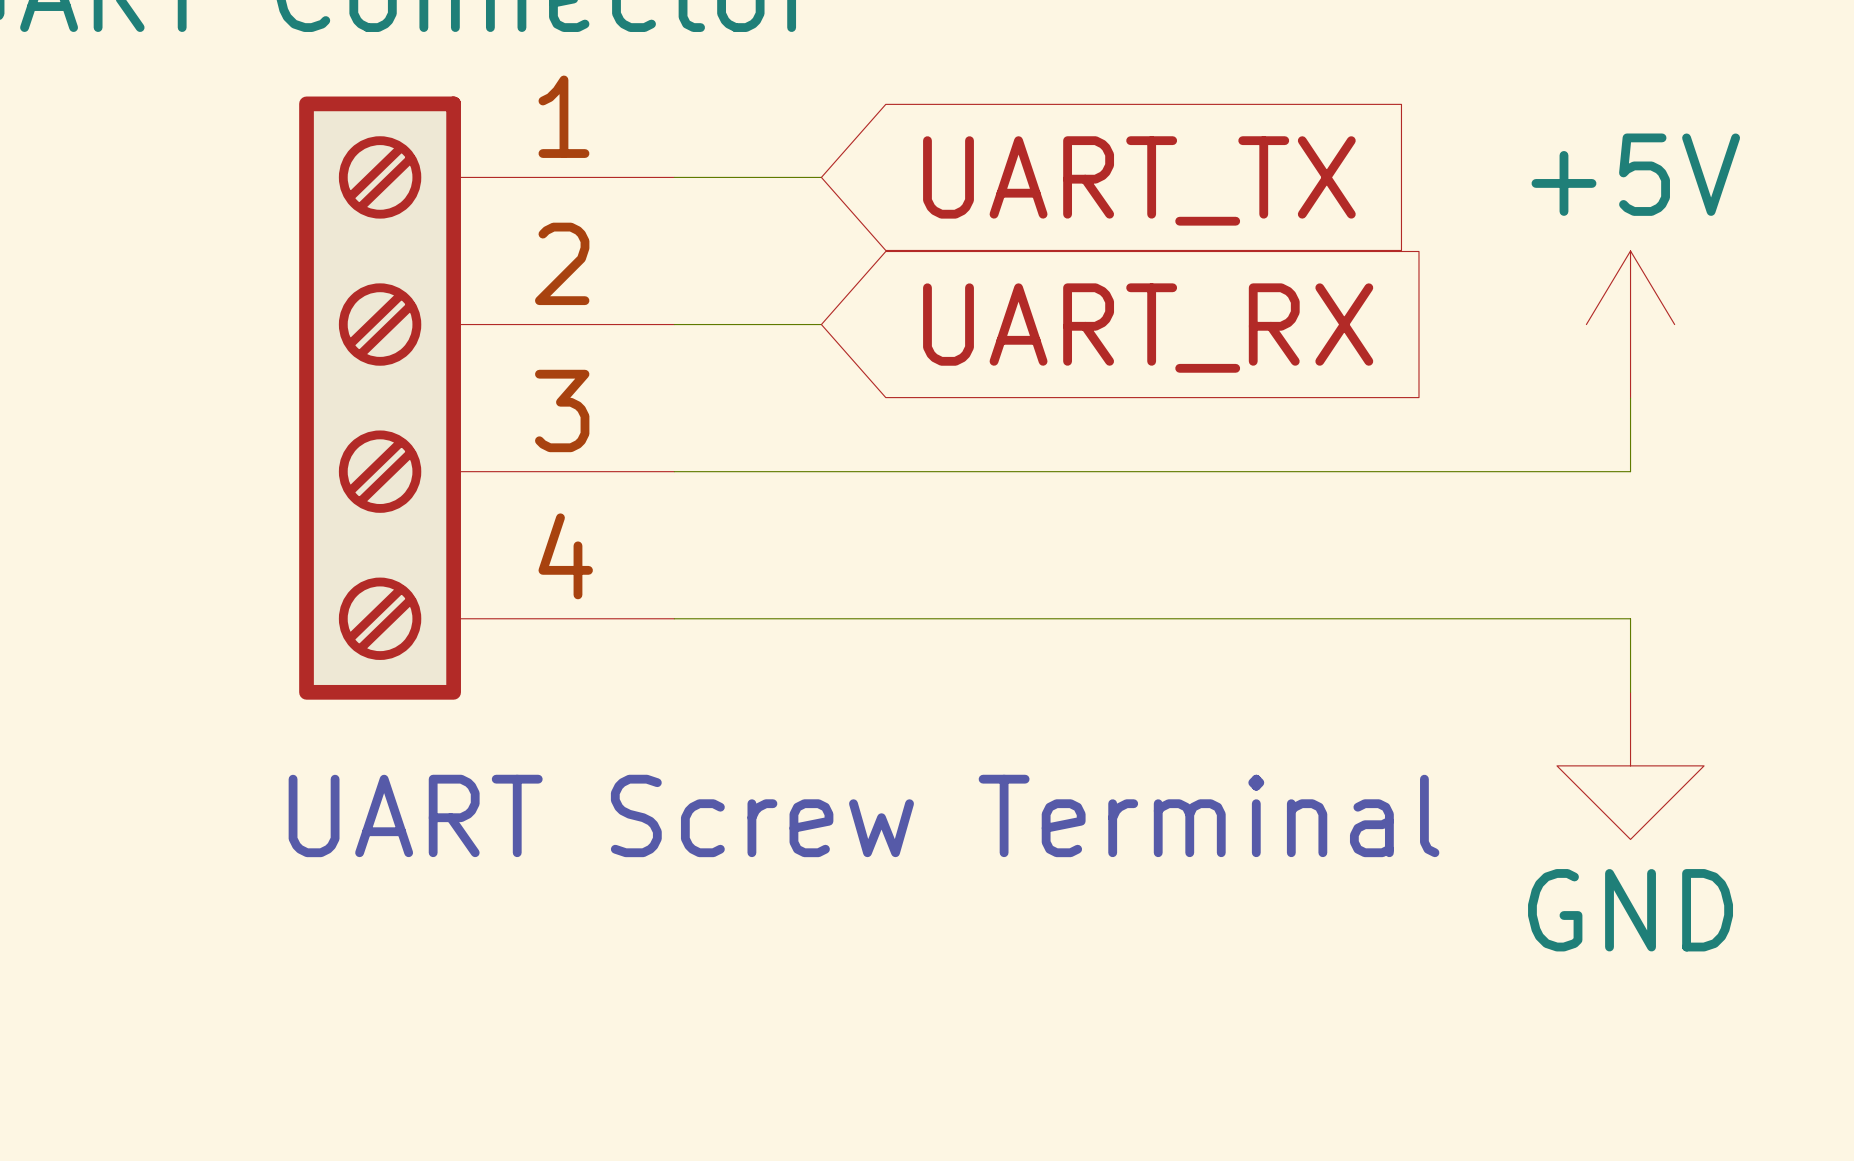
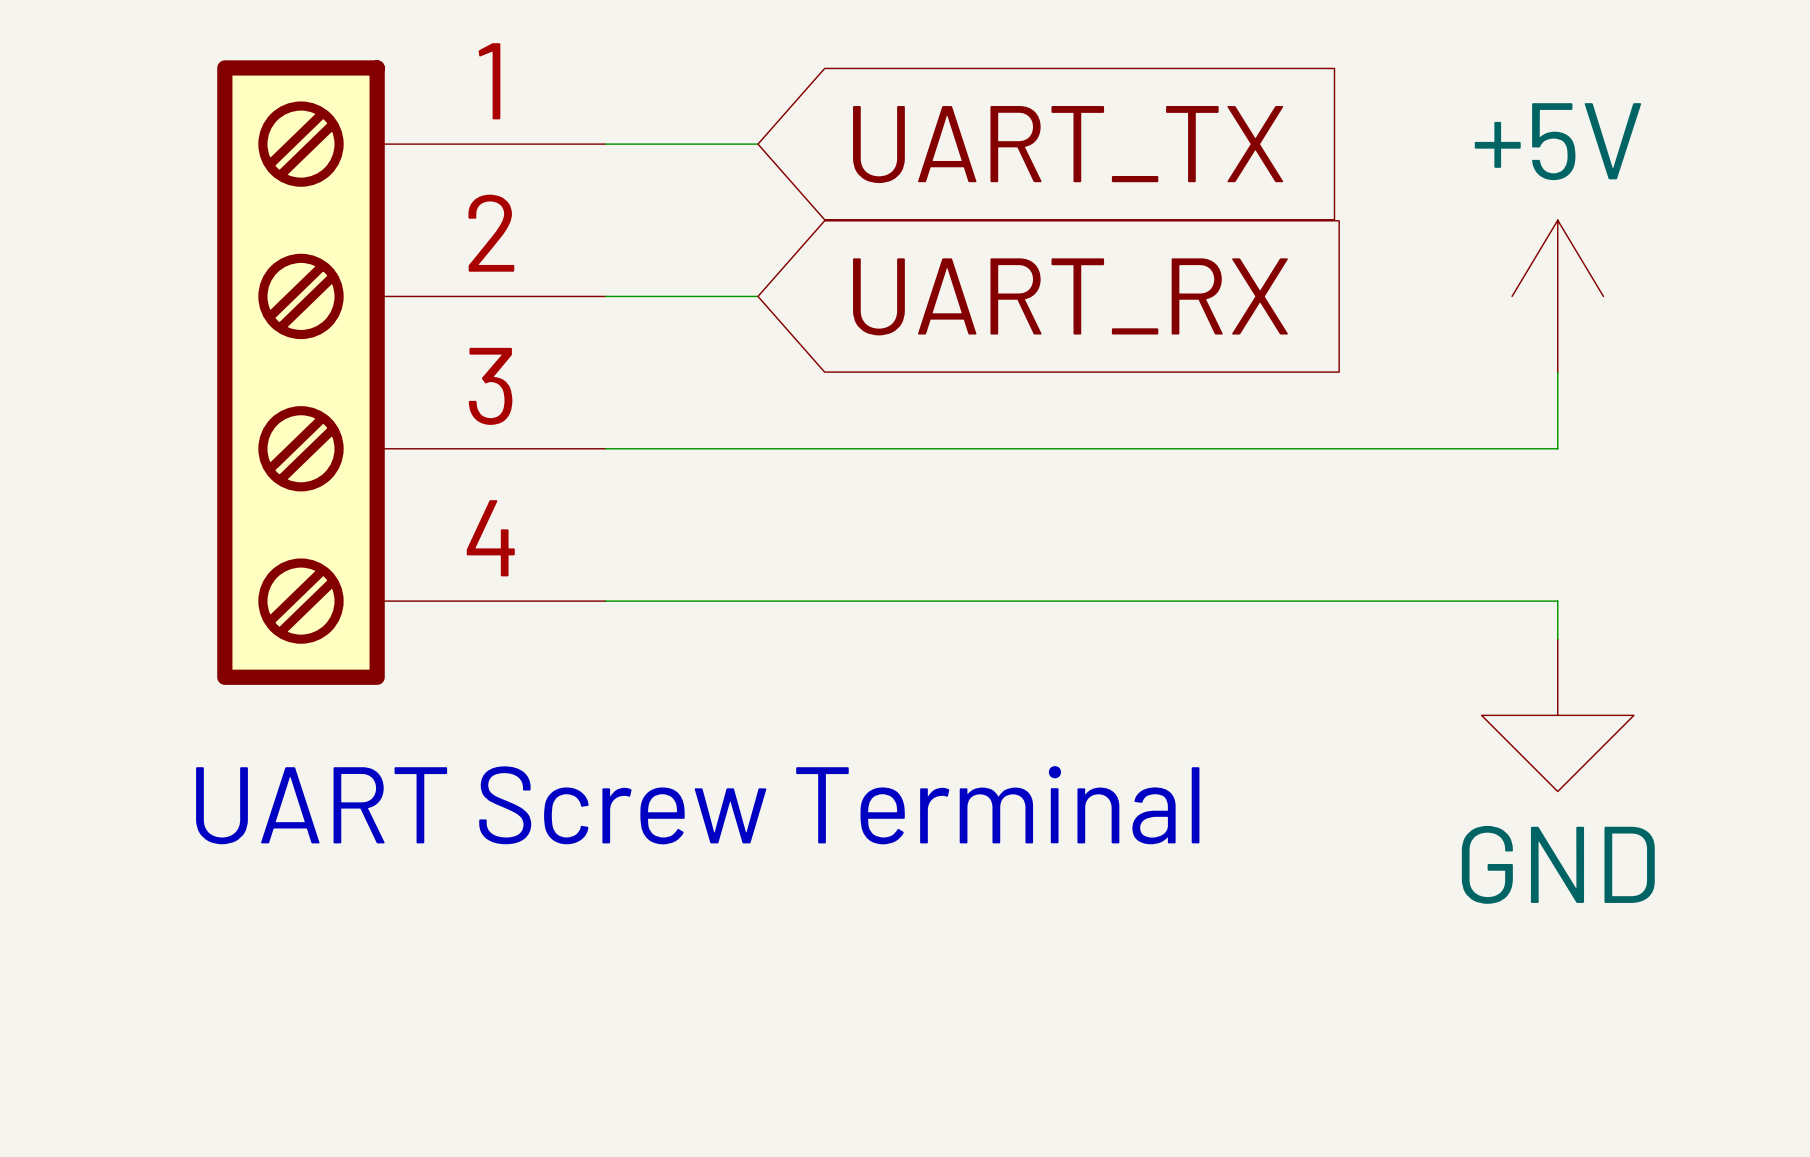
power symbol position: +5V (1630, 324) -> +5V (1557, 296)
wire: (1630, 398) (1630, 471) (1593, 471) -> (1557, 372) (1557, 448)
wire: (1593, 618) (1630, 618) (1630, 692) -> (1557, 601) (1557, 639)
power symbol position: GND (1630, 765) -> GND (1557, 715)

